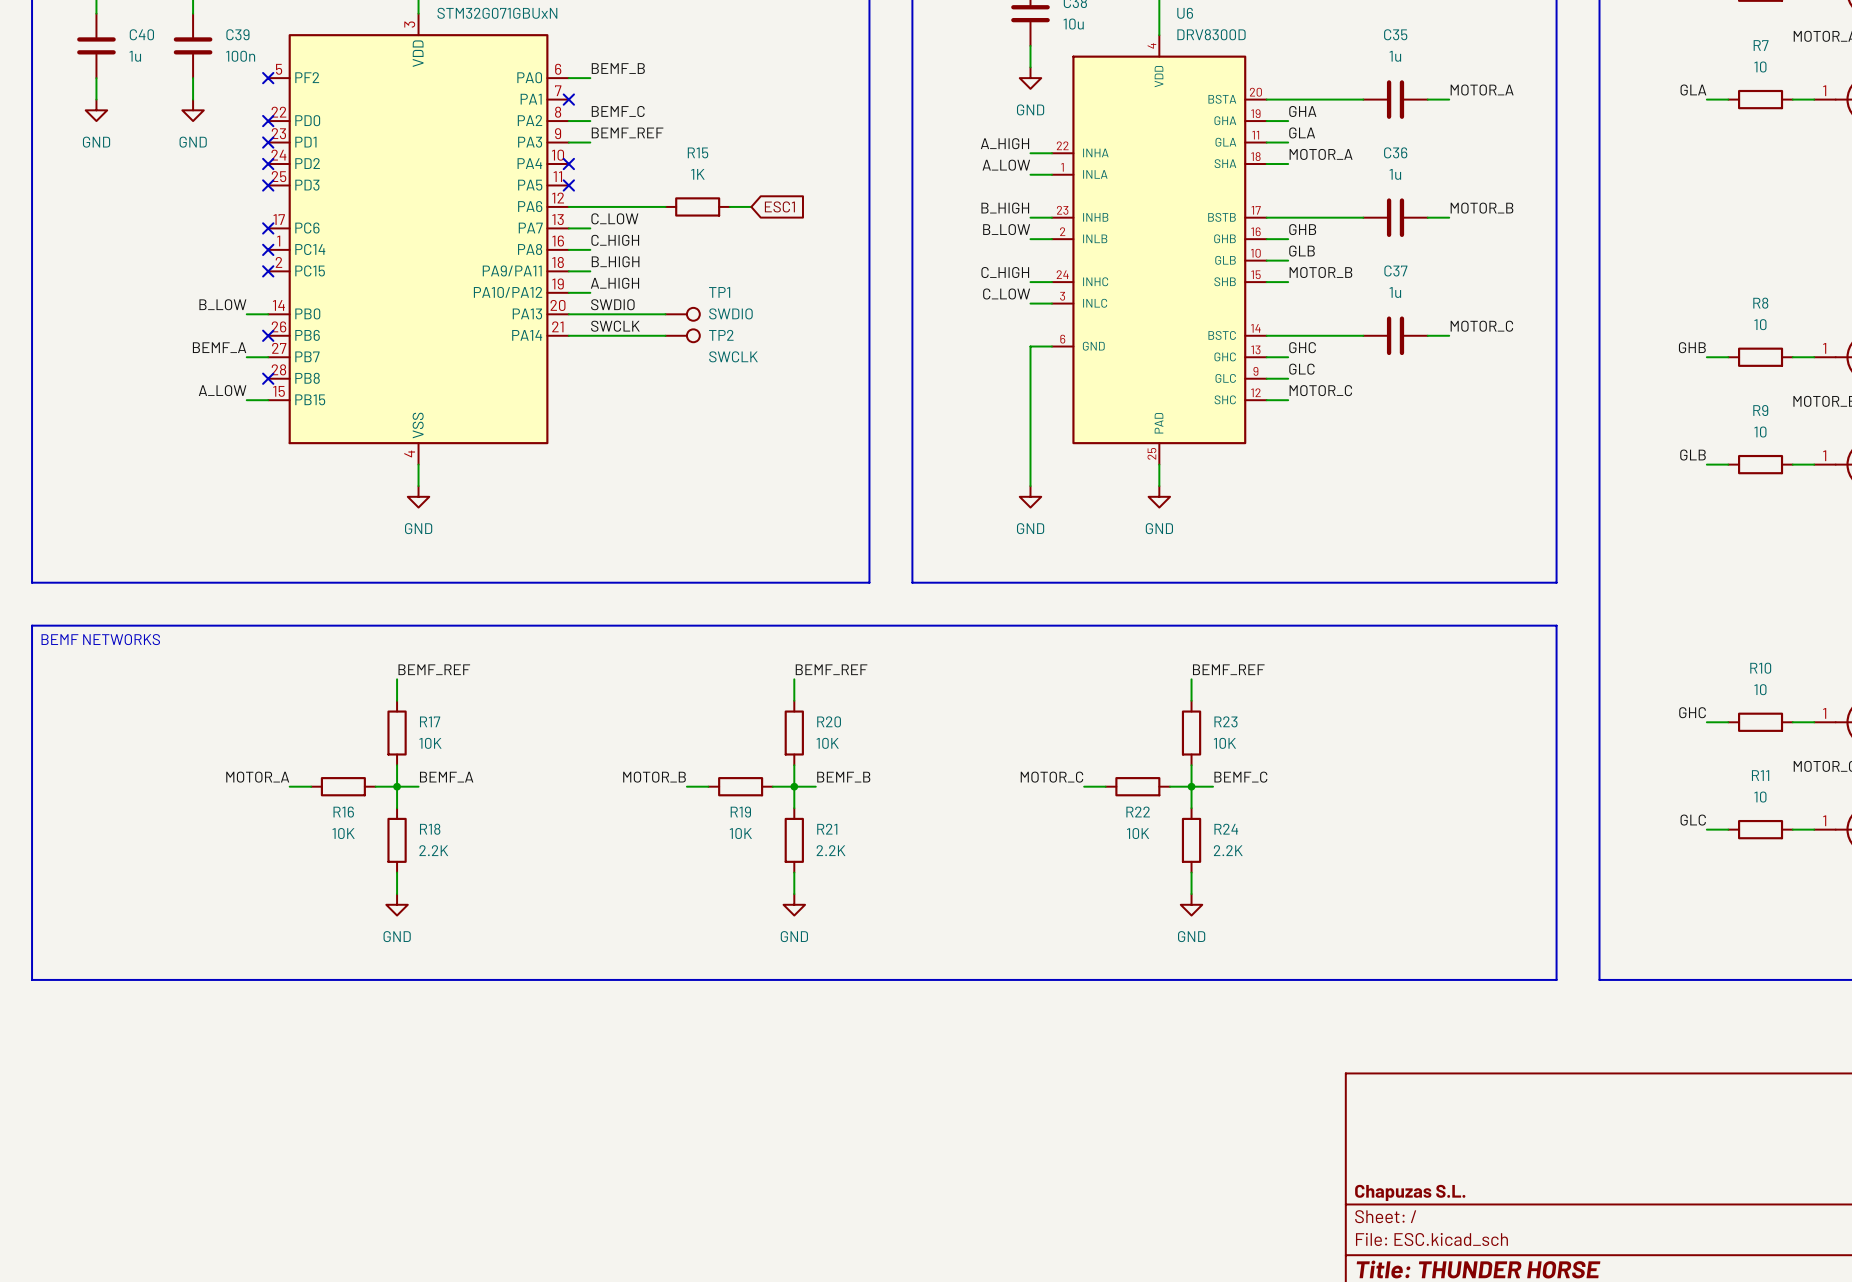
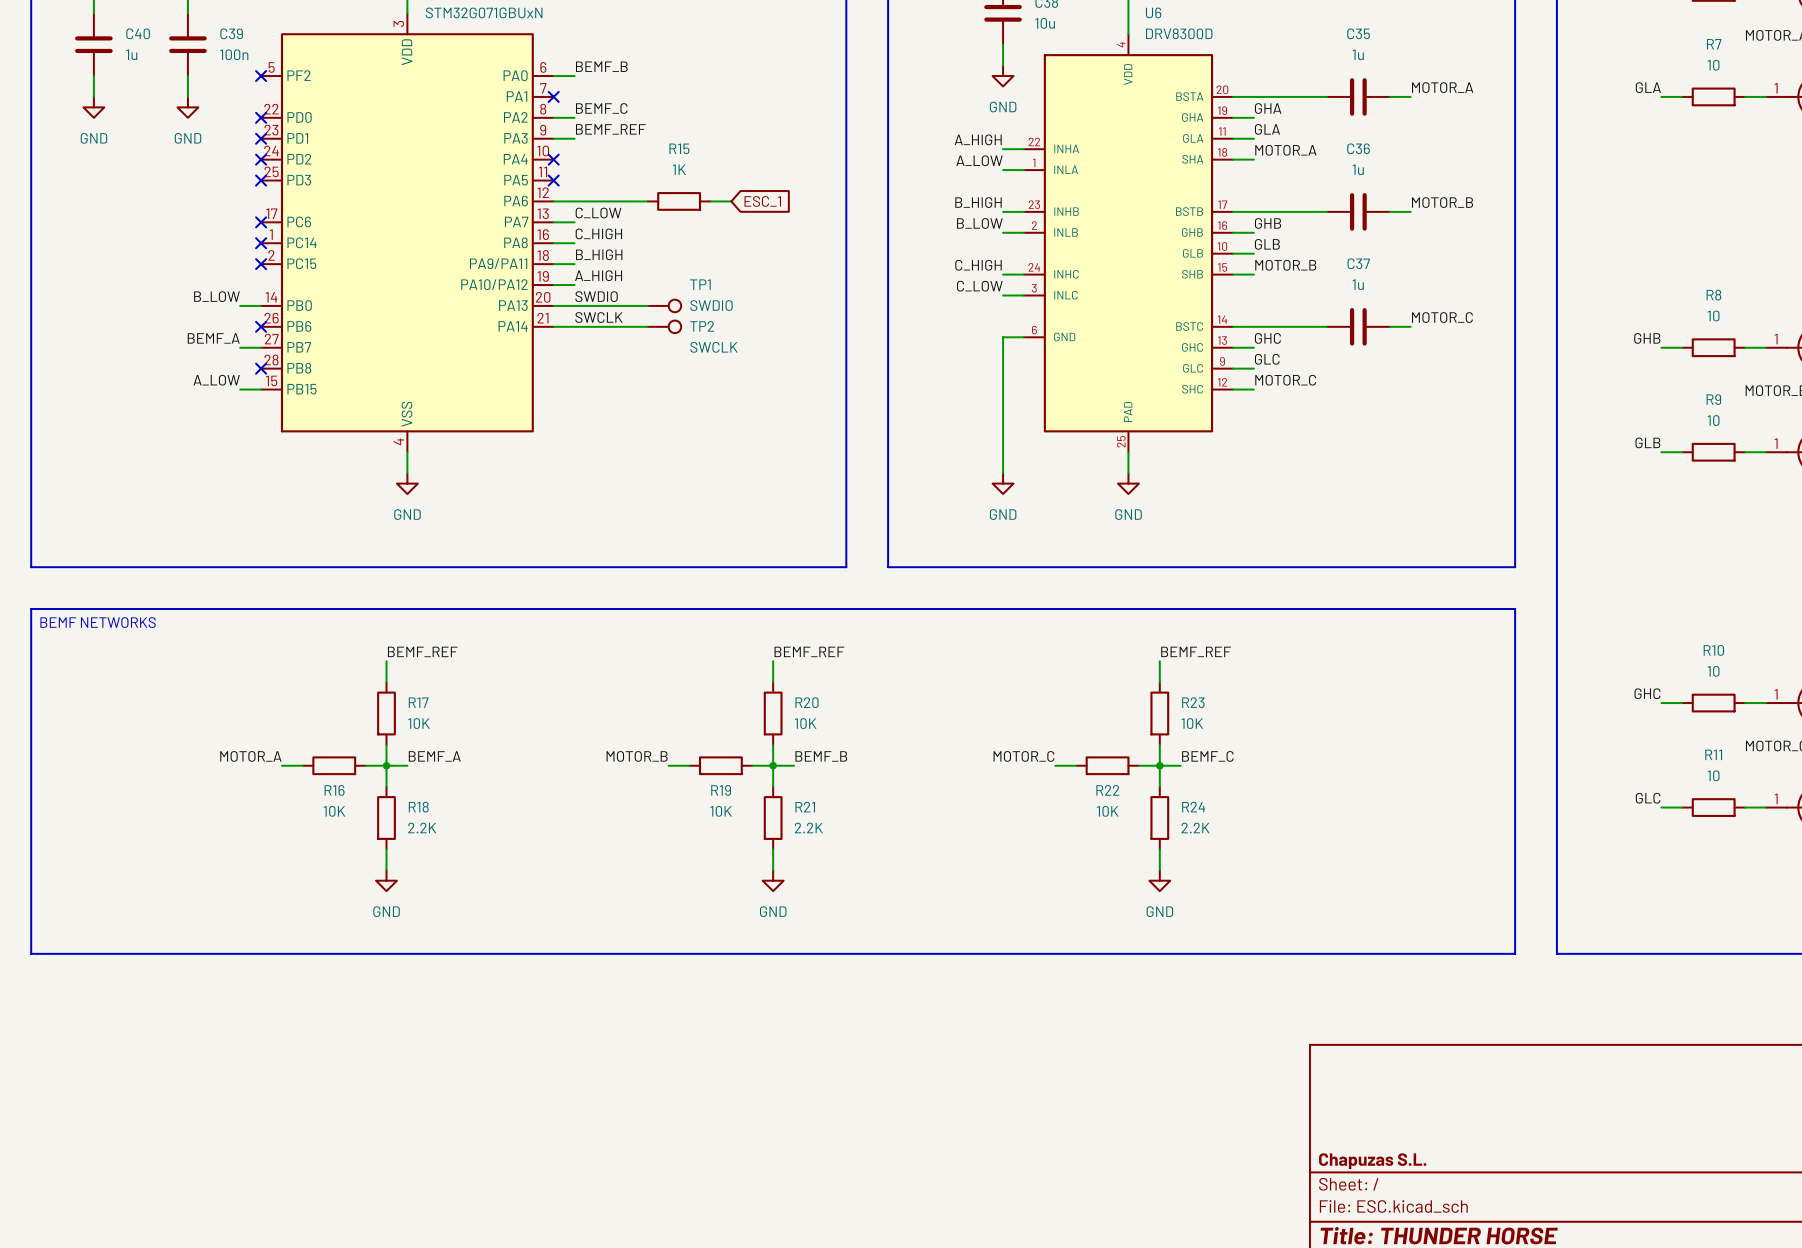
global label: ESC1 (779, 206) -> ESC_1 (762, 201)

